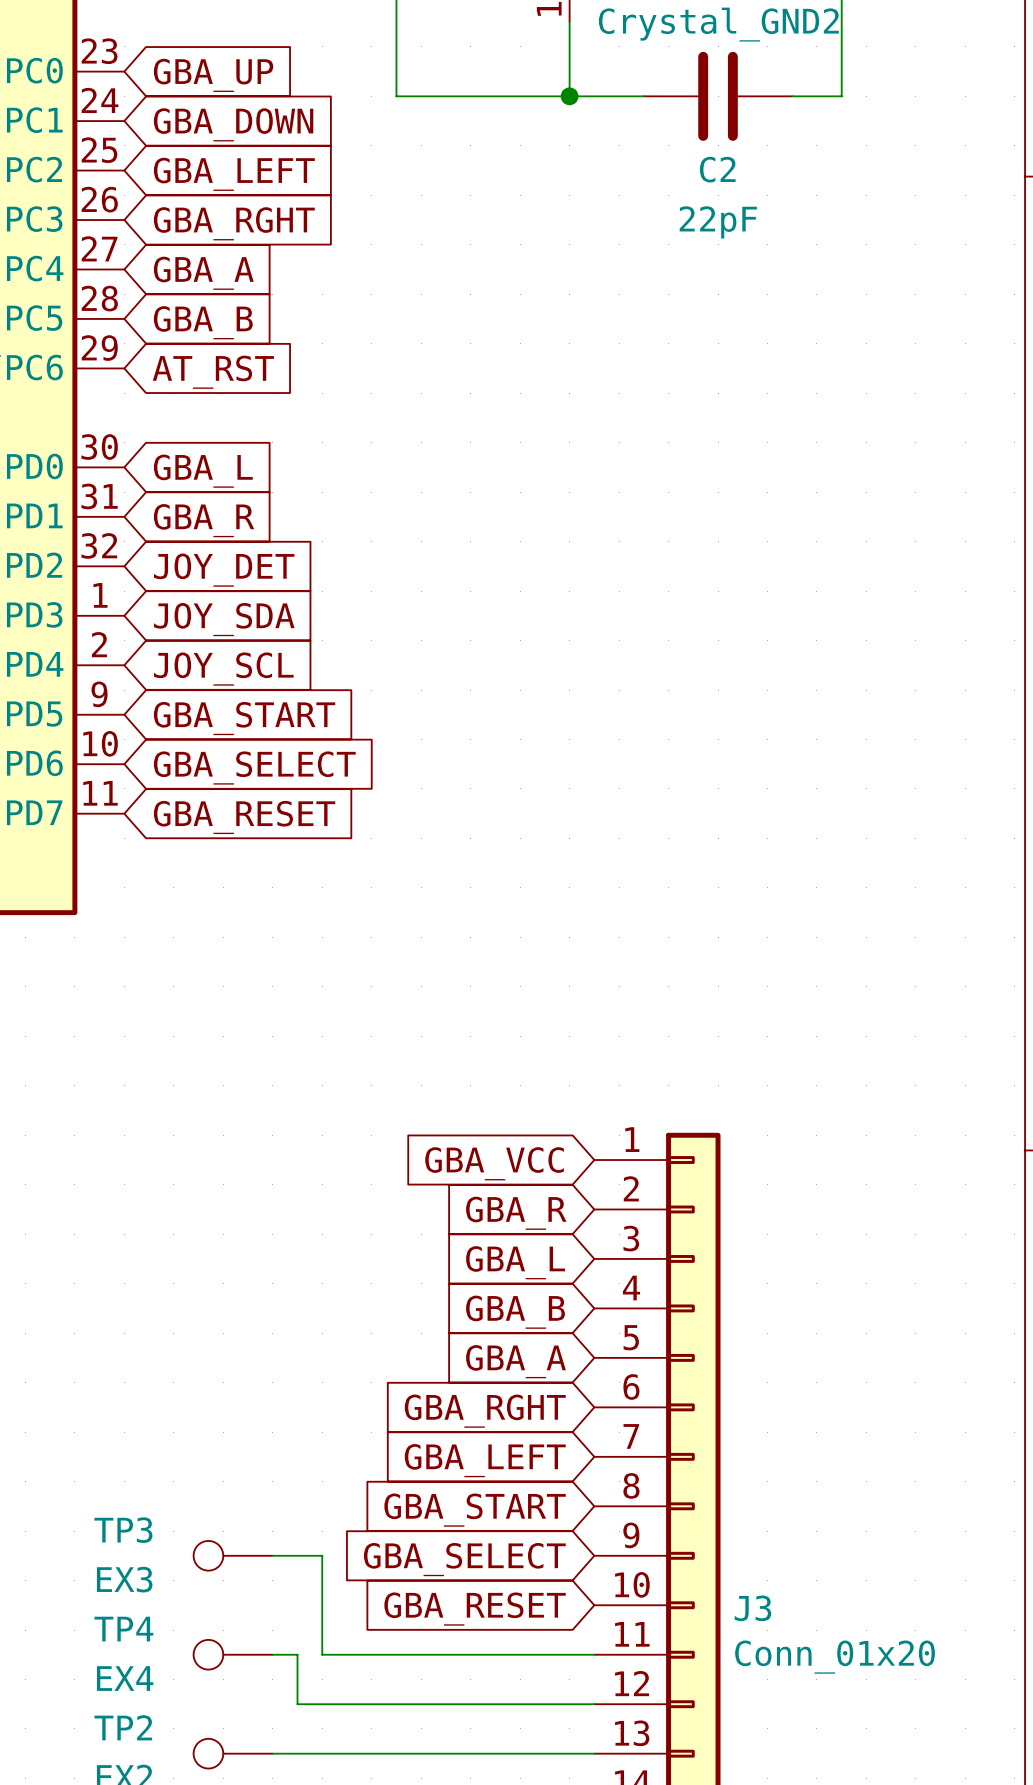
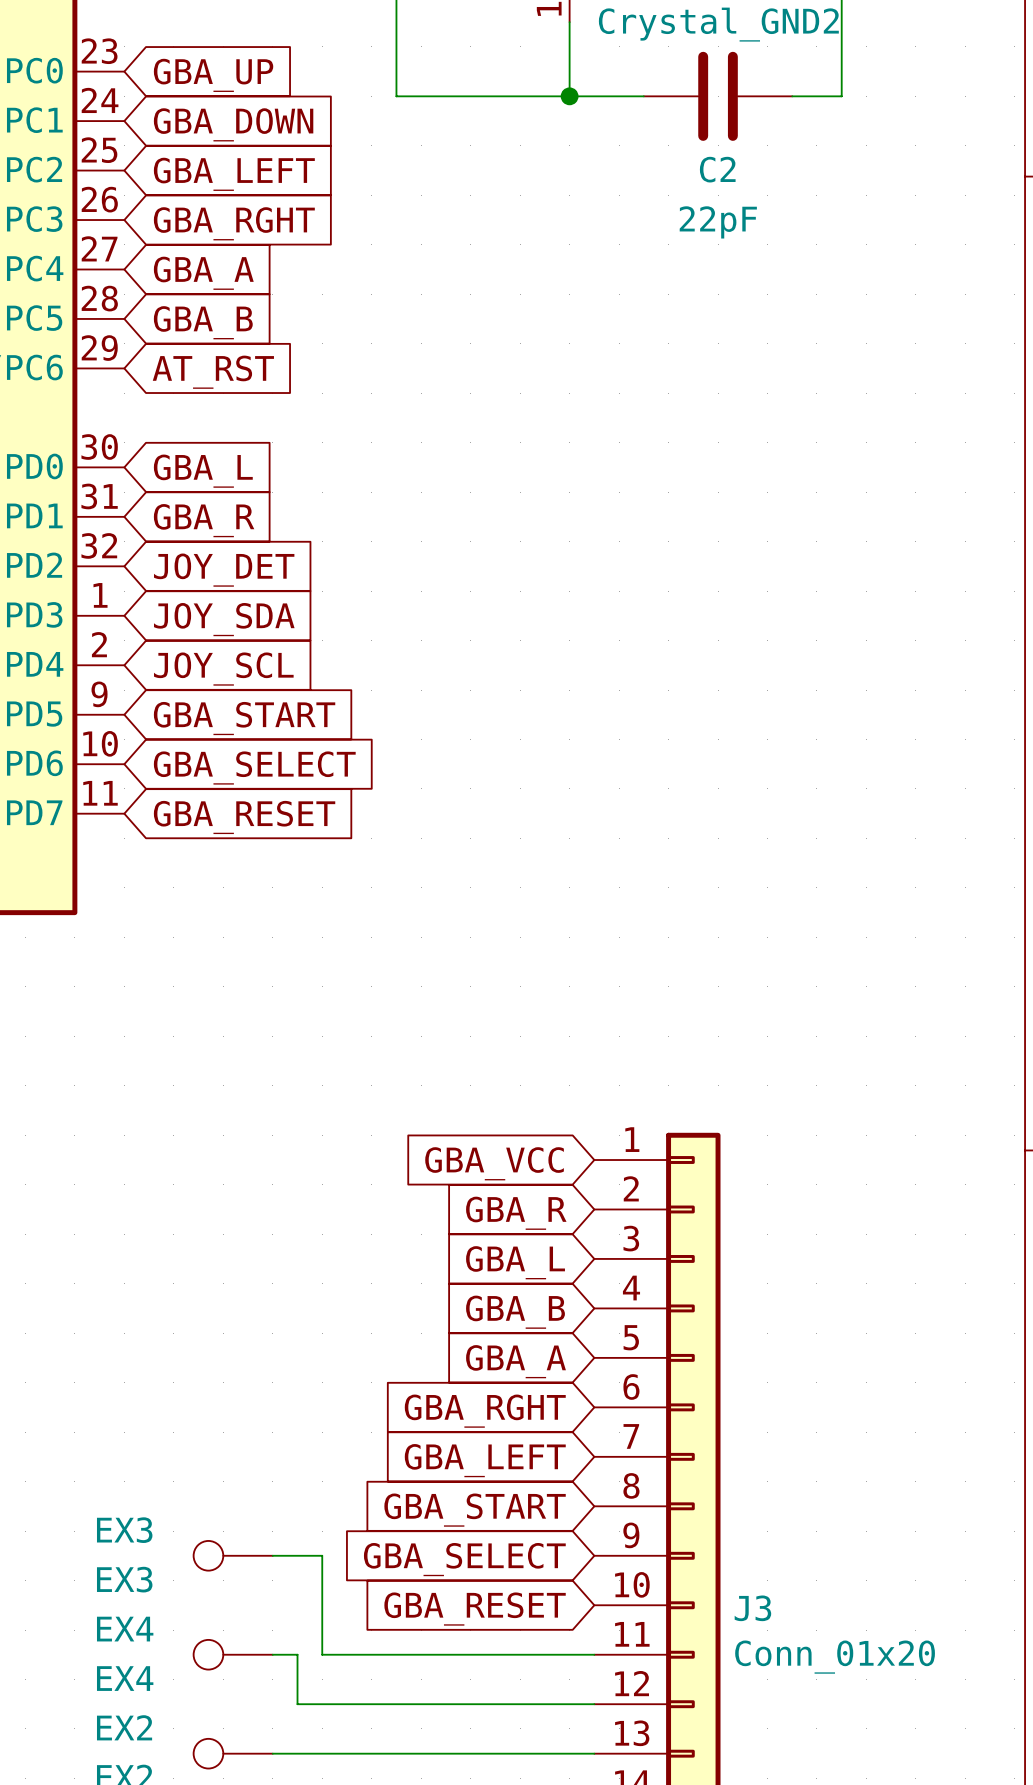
TP3 name: TP3 (123, 1530) -> EX3 (124, 1530)
TP4 name: TP4 (123, 1629) -> EX4 (125, 1629)
TP2 name: TP2 (123, 1727) -> EX2 (124, 1727)

